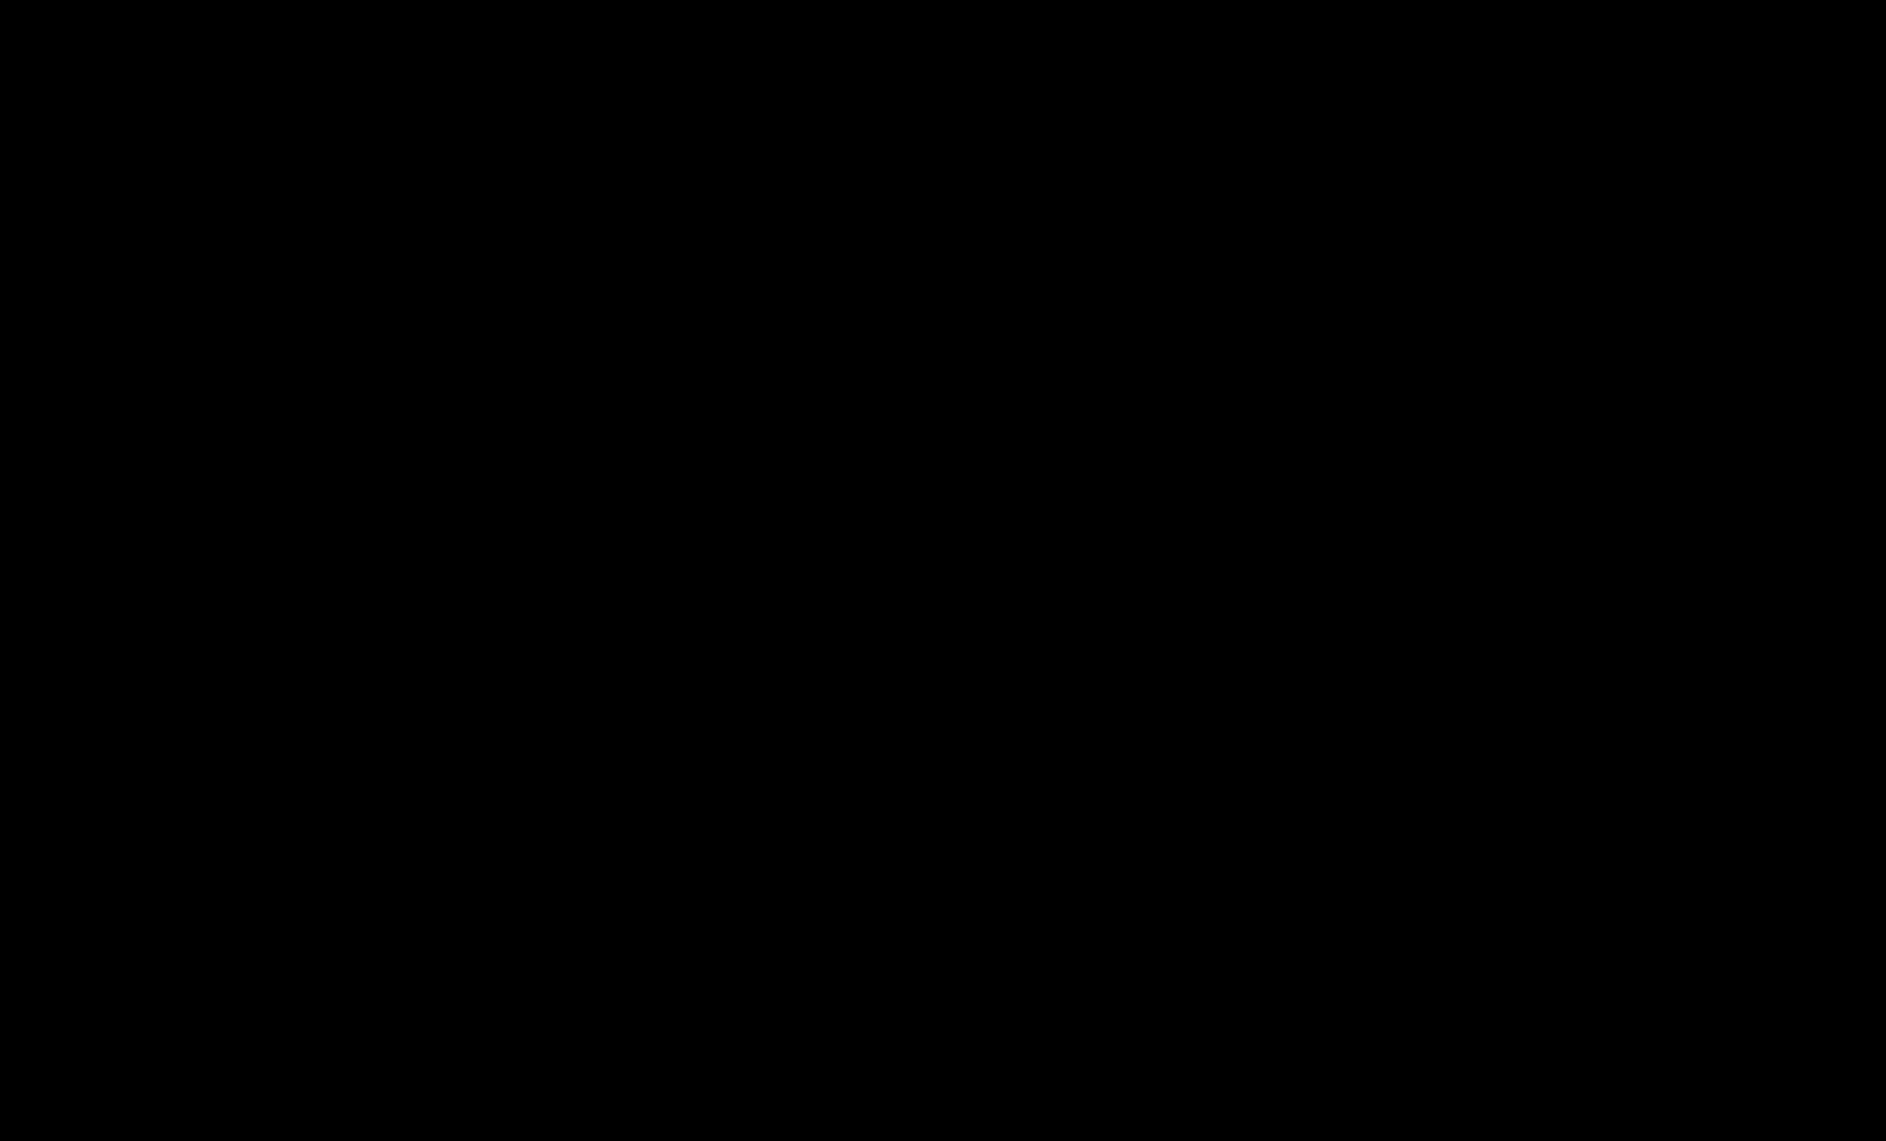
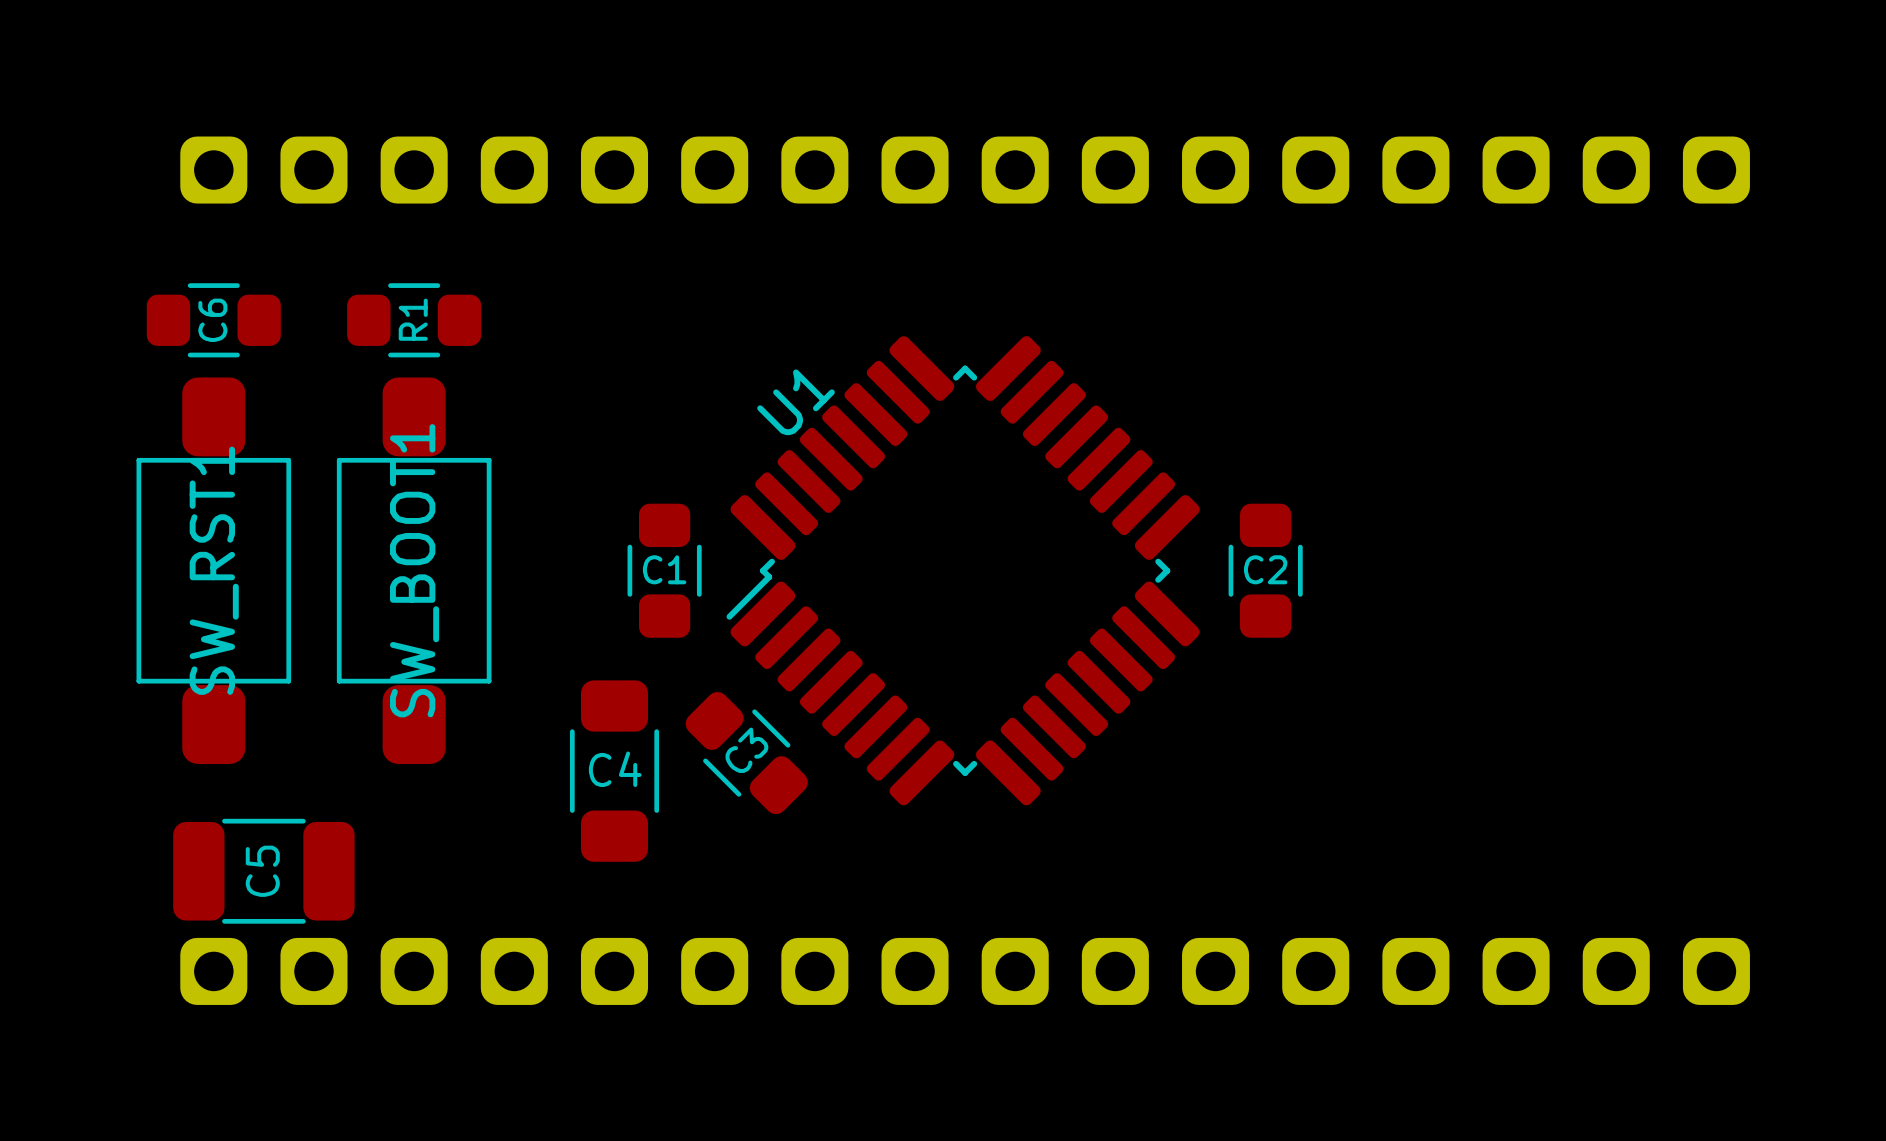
part: none -> (965, 170)
C6: none -> (213, 320)
R1: none -> (414, 320)
SW_RST1: none -> (213, 570)
SW_BOOT1: none -> (414, 570)
C1: none -> (664, 570)
U1: none -> (963, 570)
C2: none -> (1265, 570)
C3: none -> (746, 753)
C4: none -> (614, 771)
C5: none -> (263, 871)
part: none -> (965, 971)

